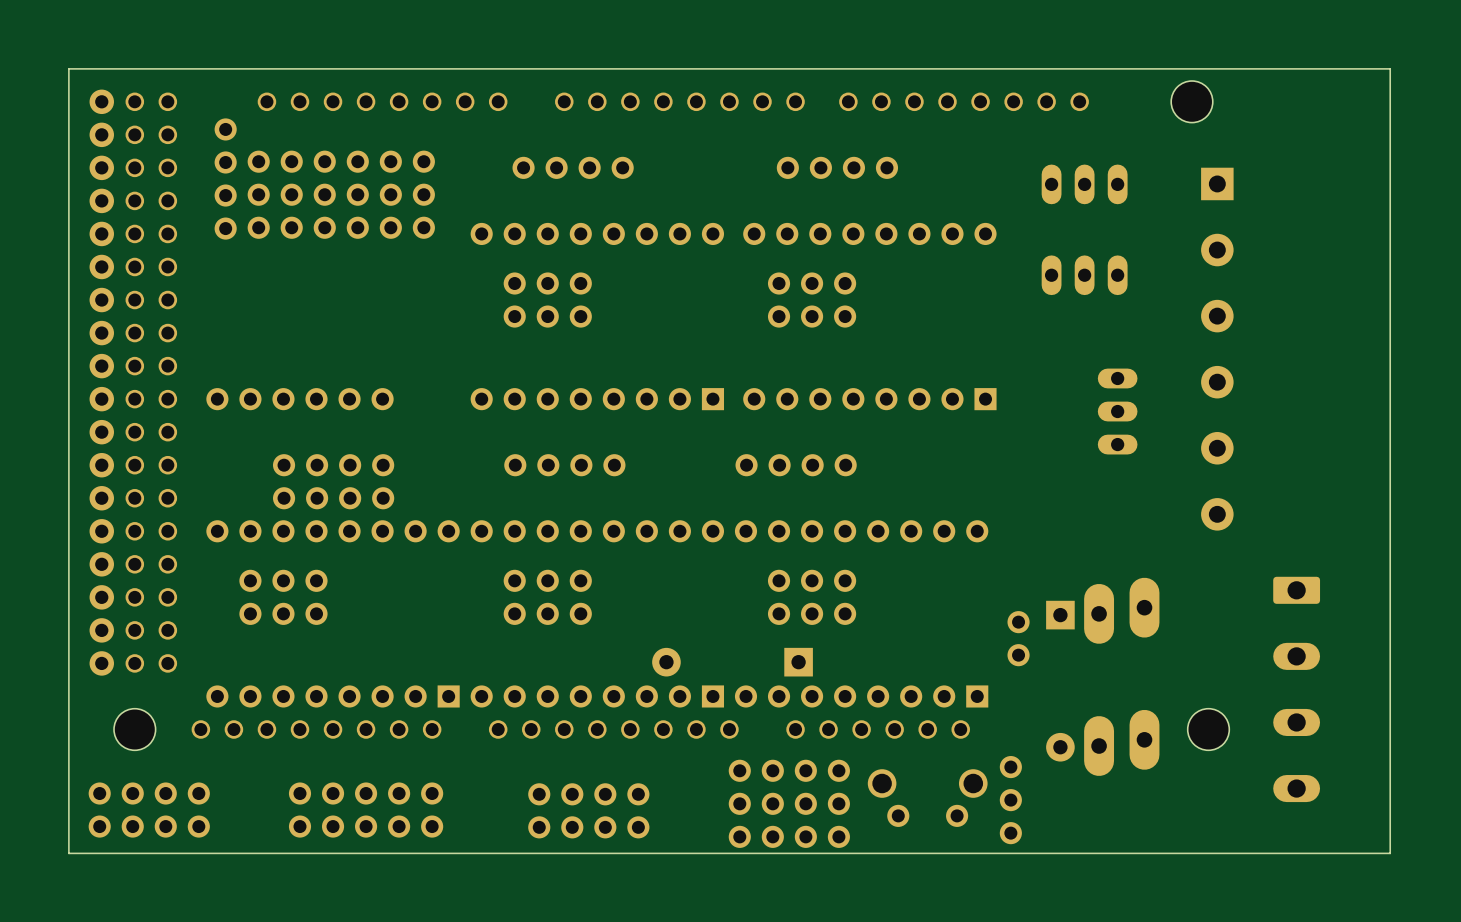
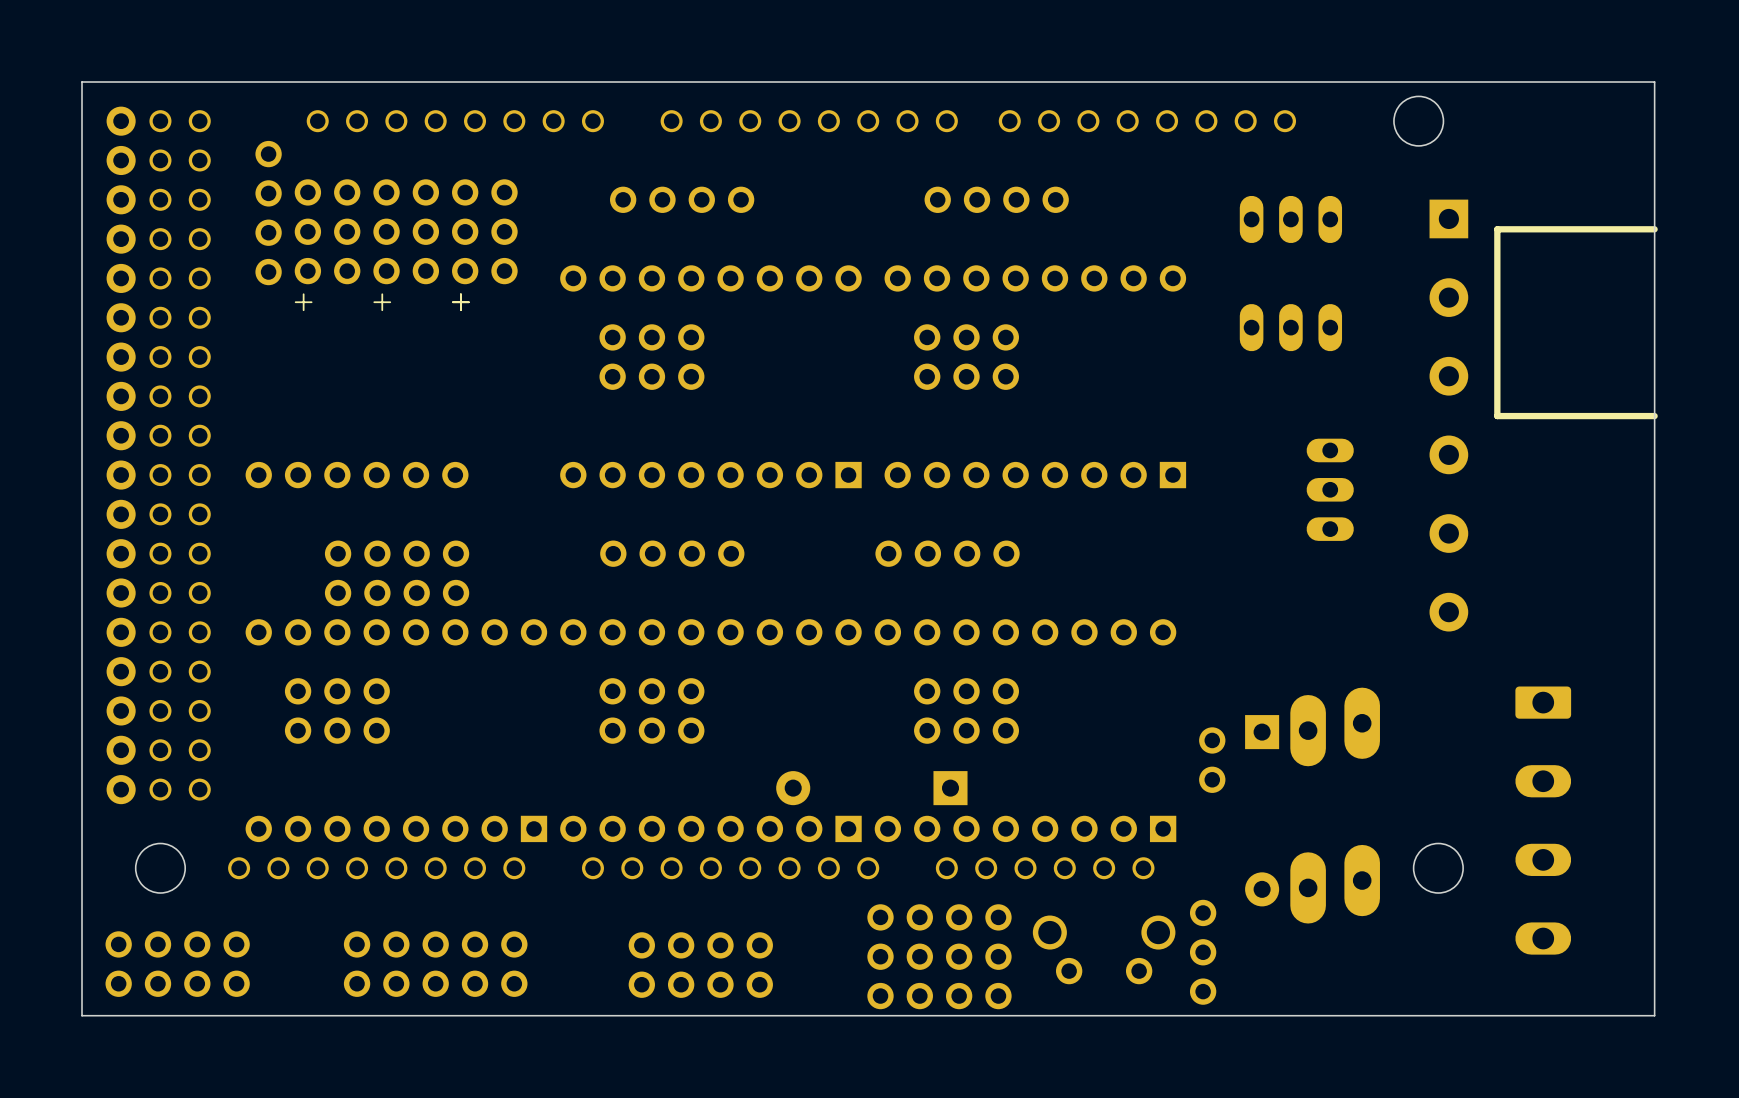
line: none -> (1654, 229) (1497, 229) (1497, 416) (1654, 416)
text: none -> + (303, 302)
text: none -> + (382, 302)
text: none -> + (460, 302)

